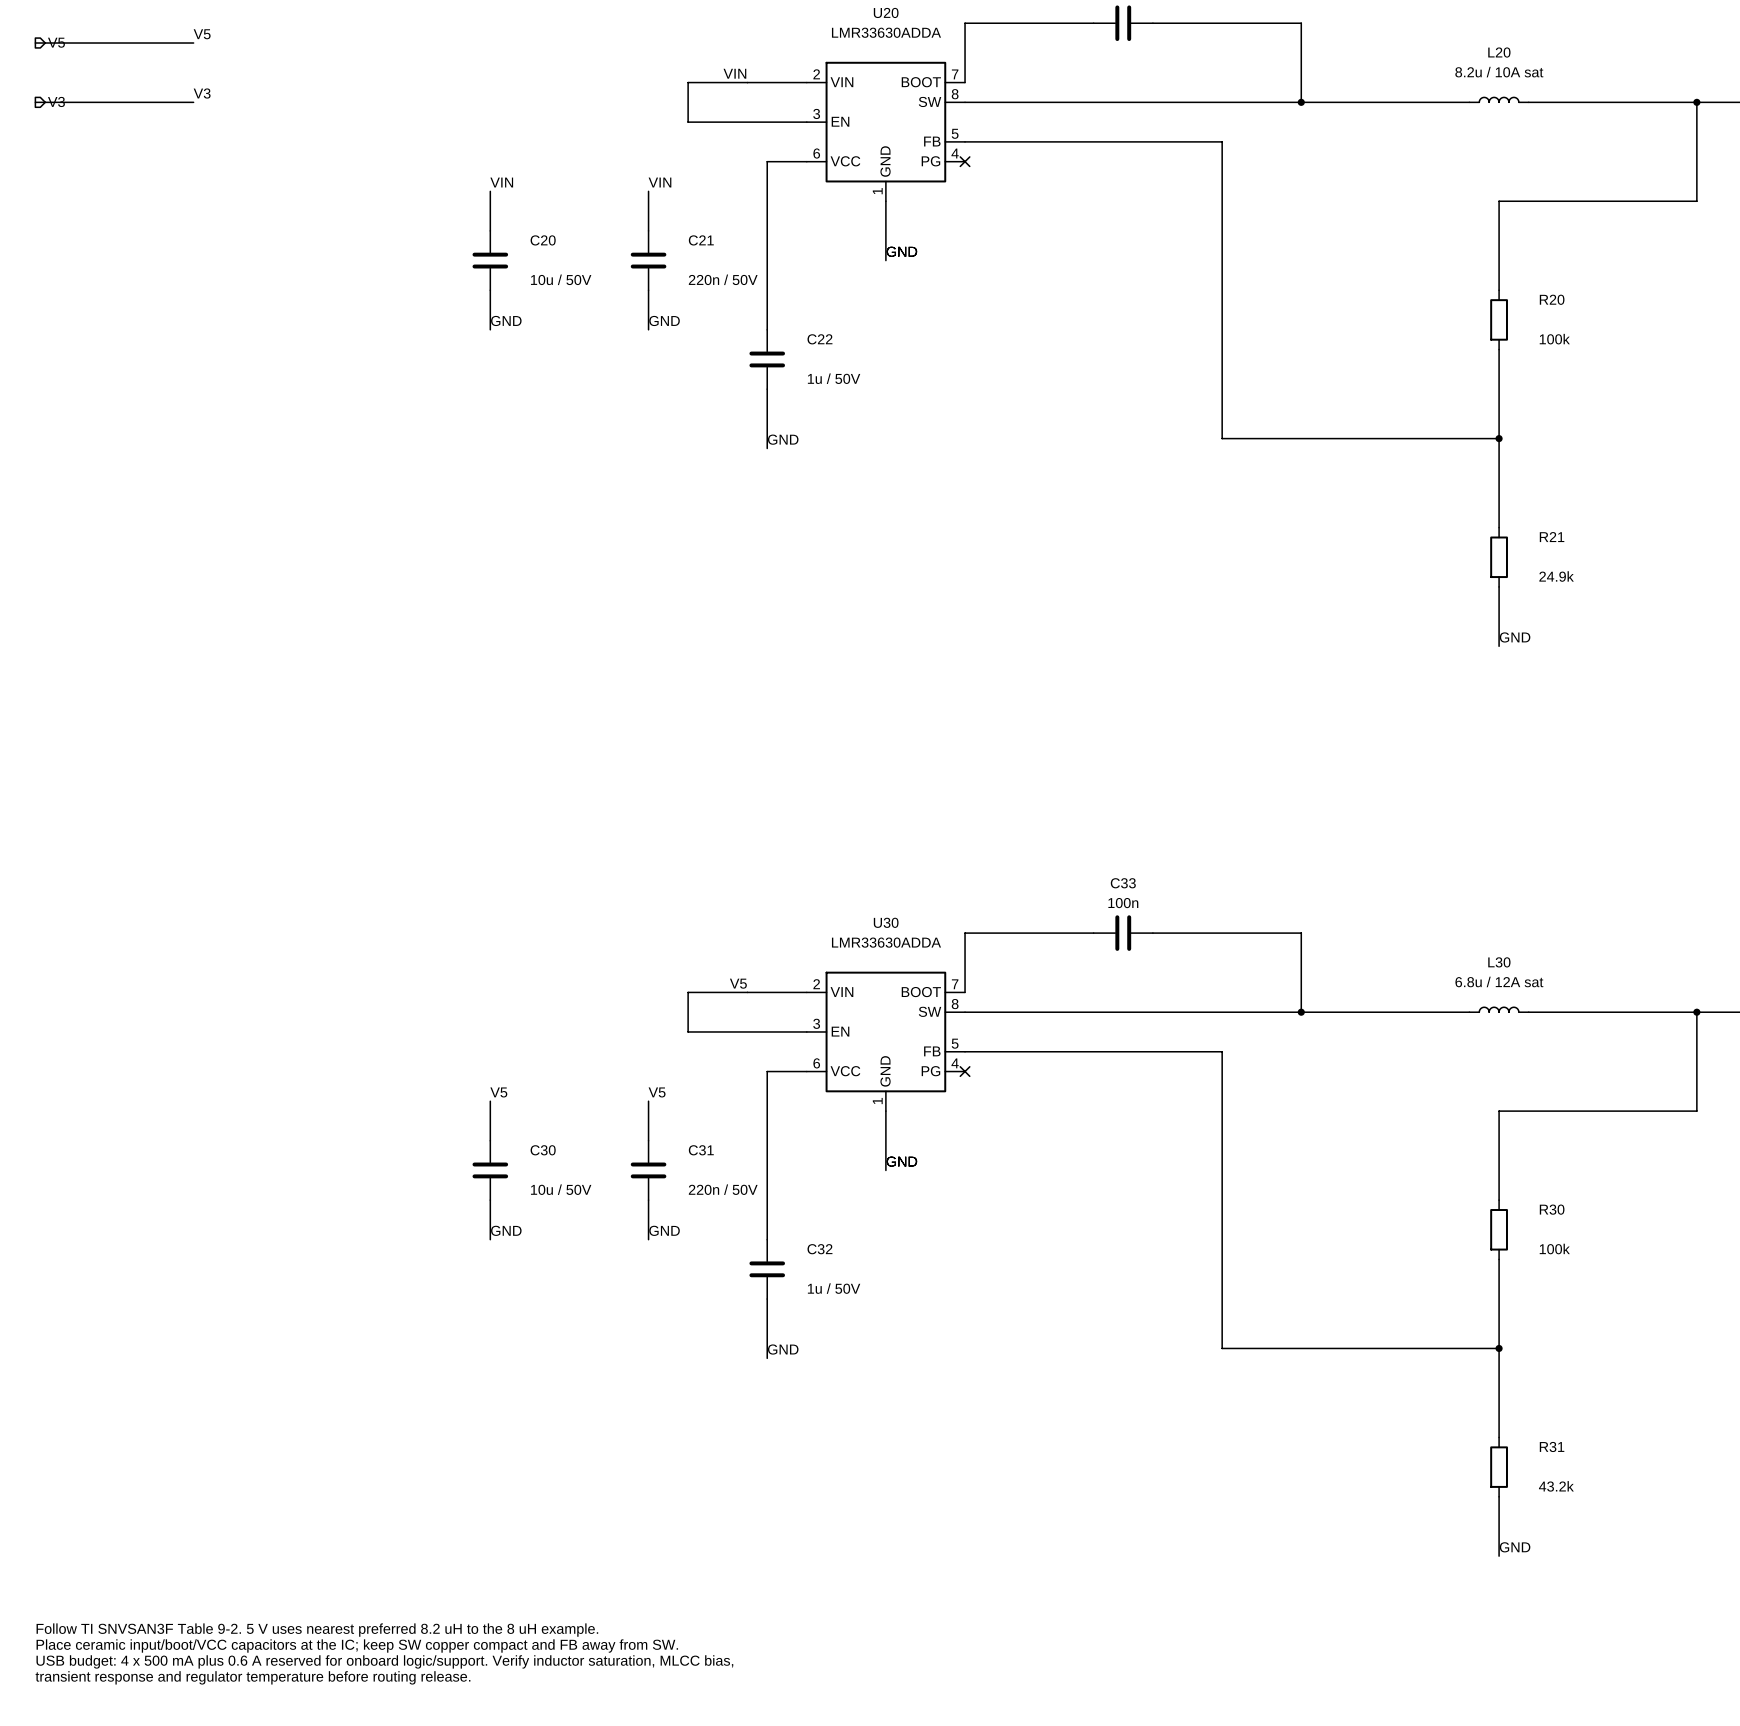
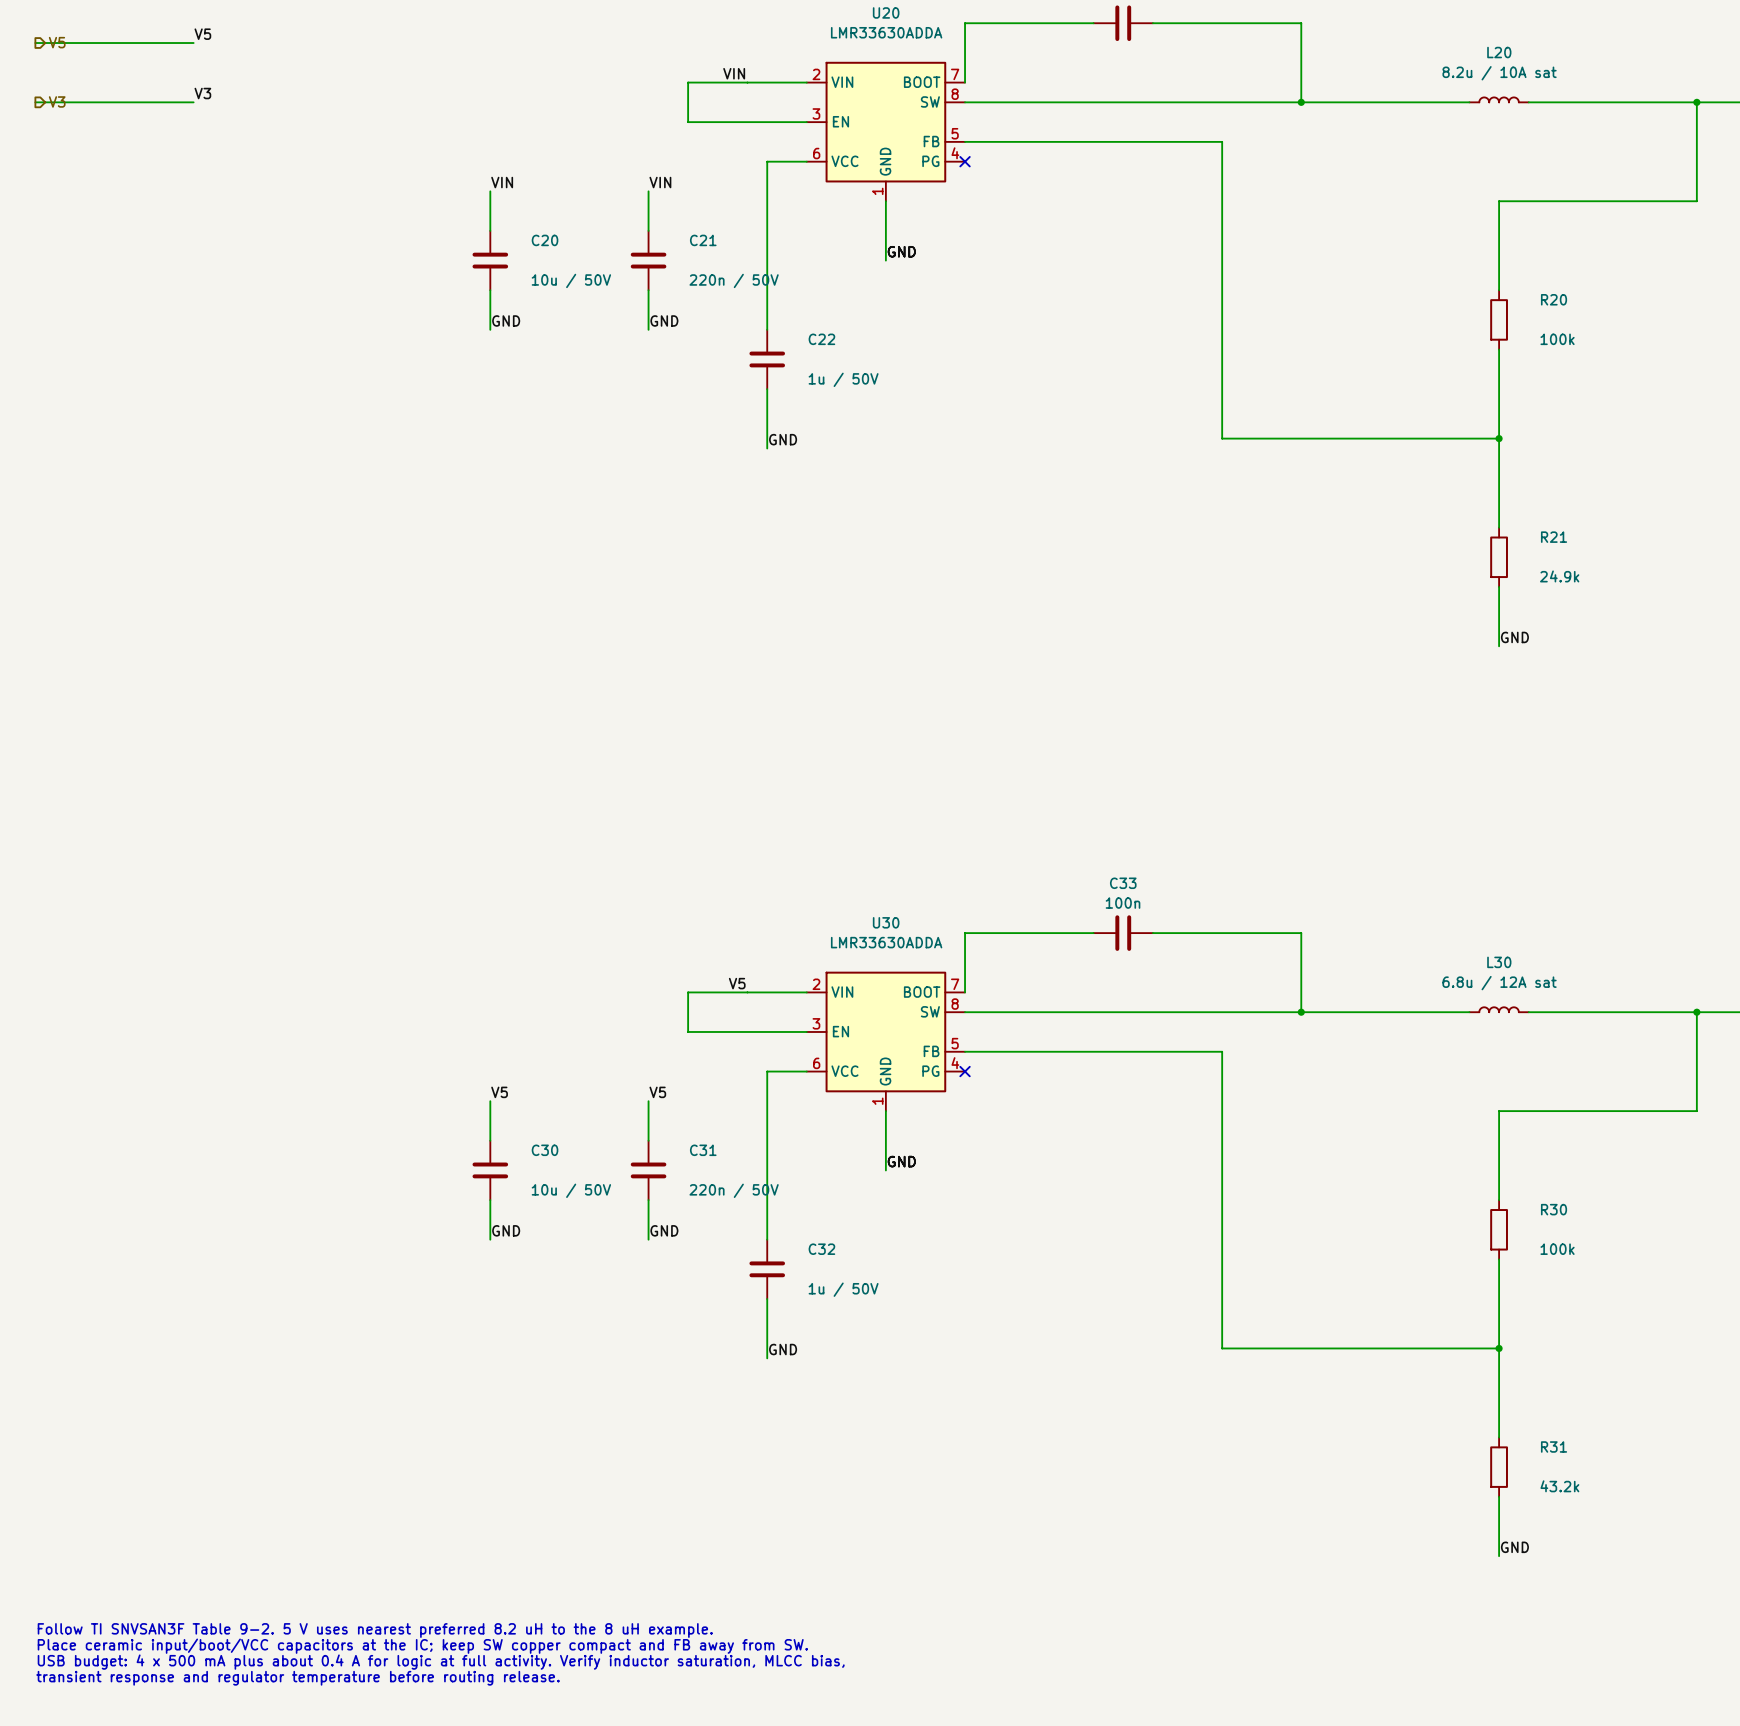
text: USB budget: 4 x 500 mA plus 0.6 A reserved for onboard logic/support. Verify inductor saturation, MLCC bias, (384, 1661) -> USB budget: 4 x 500 mA plus about 0.4 A for logic at full activity. Verify inductor saturation, MLCC bias, (441, 1662)

